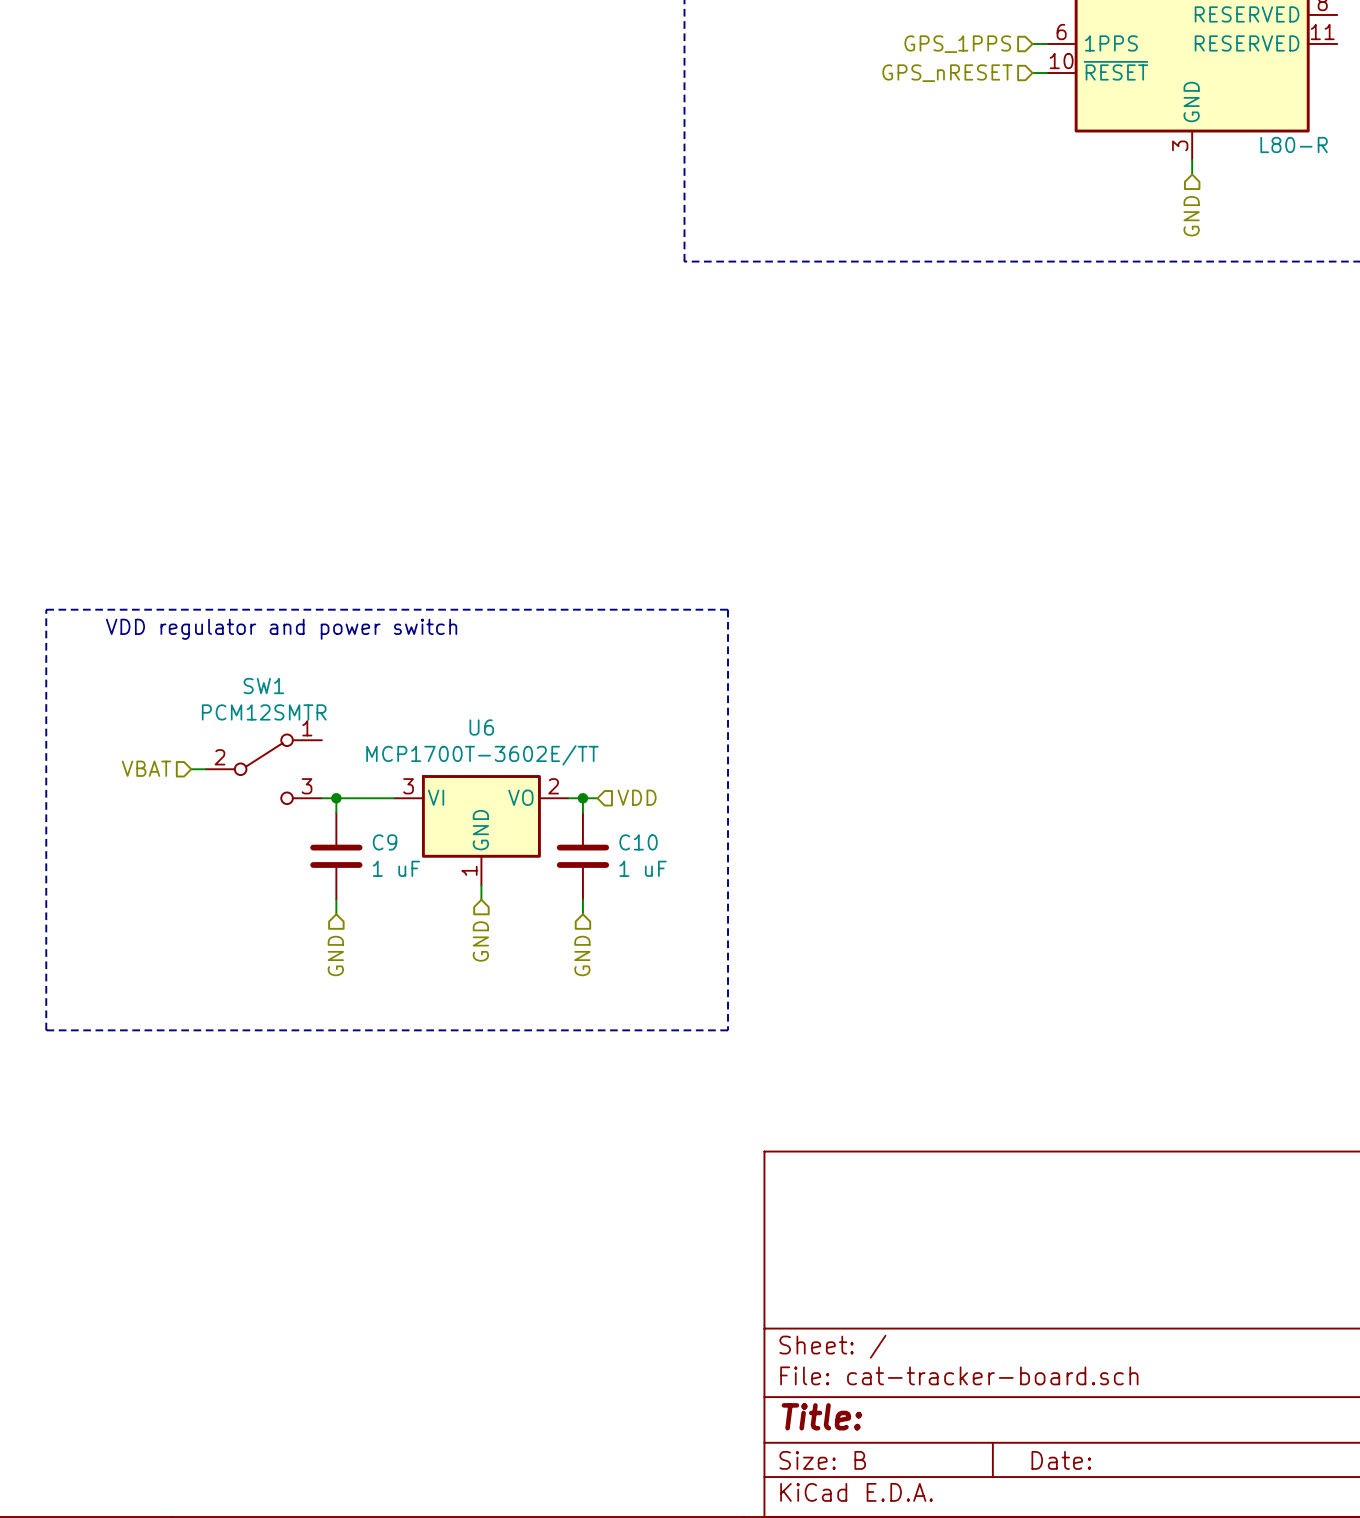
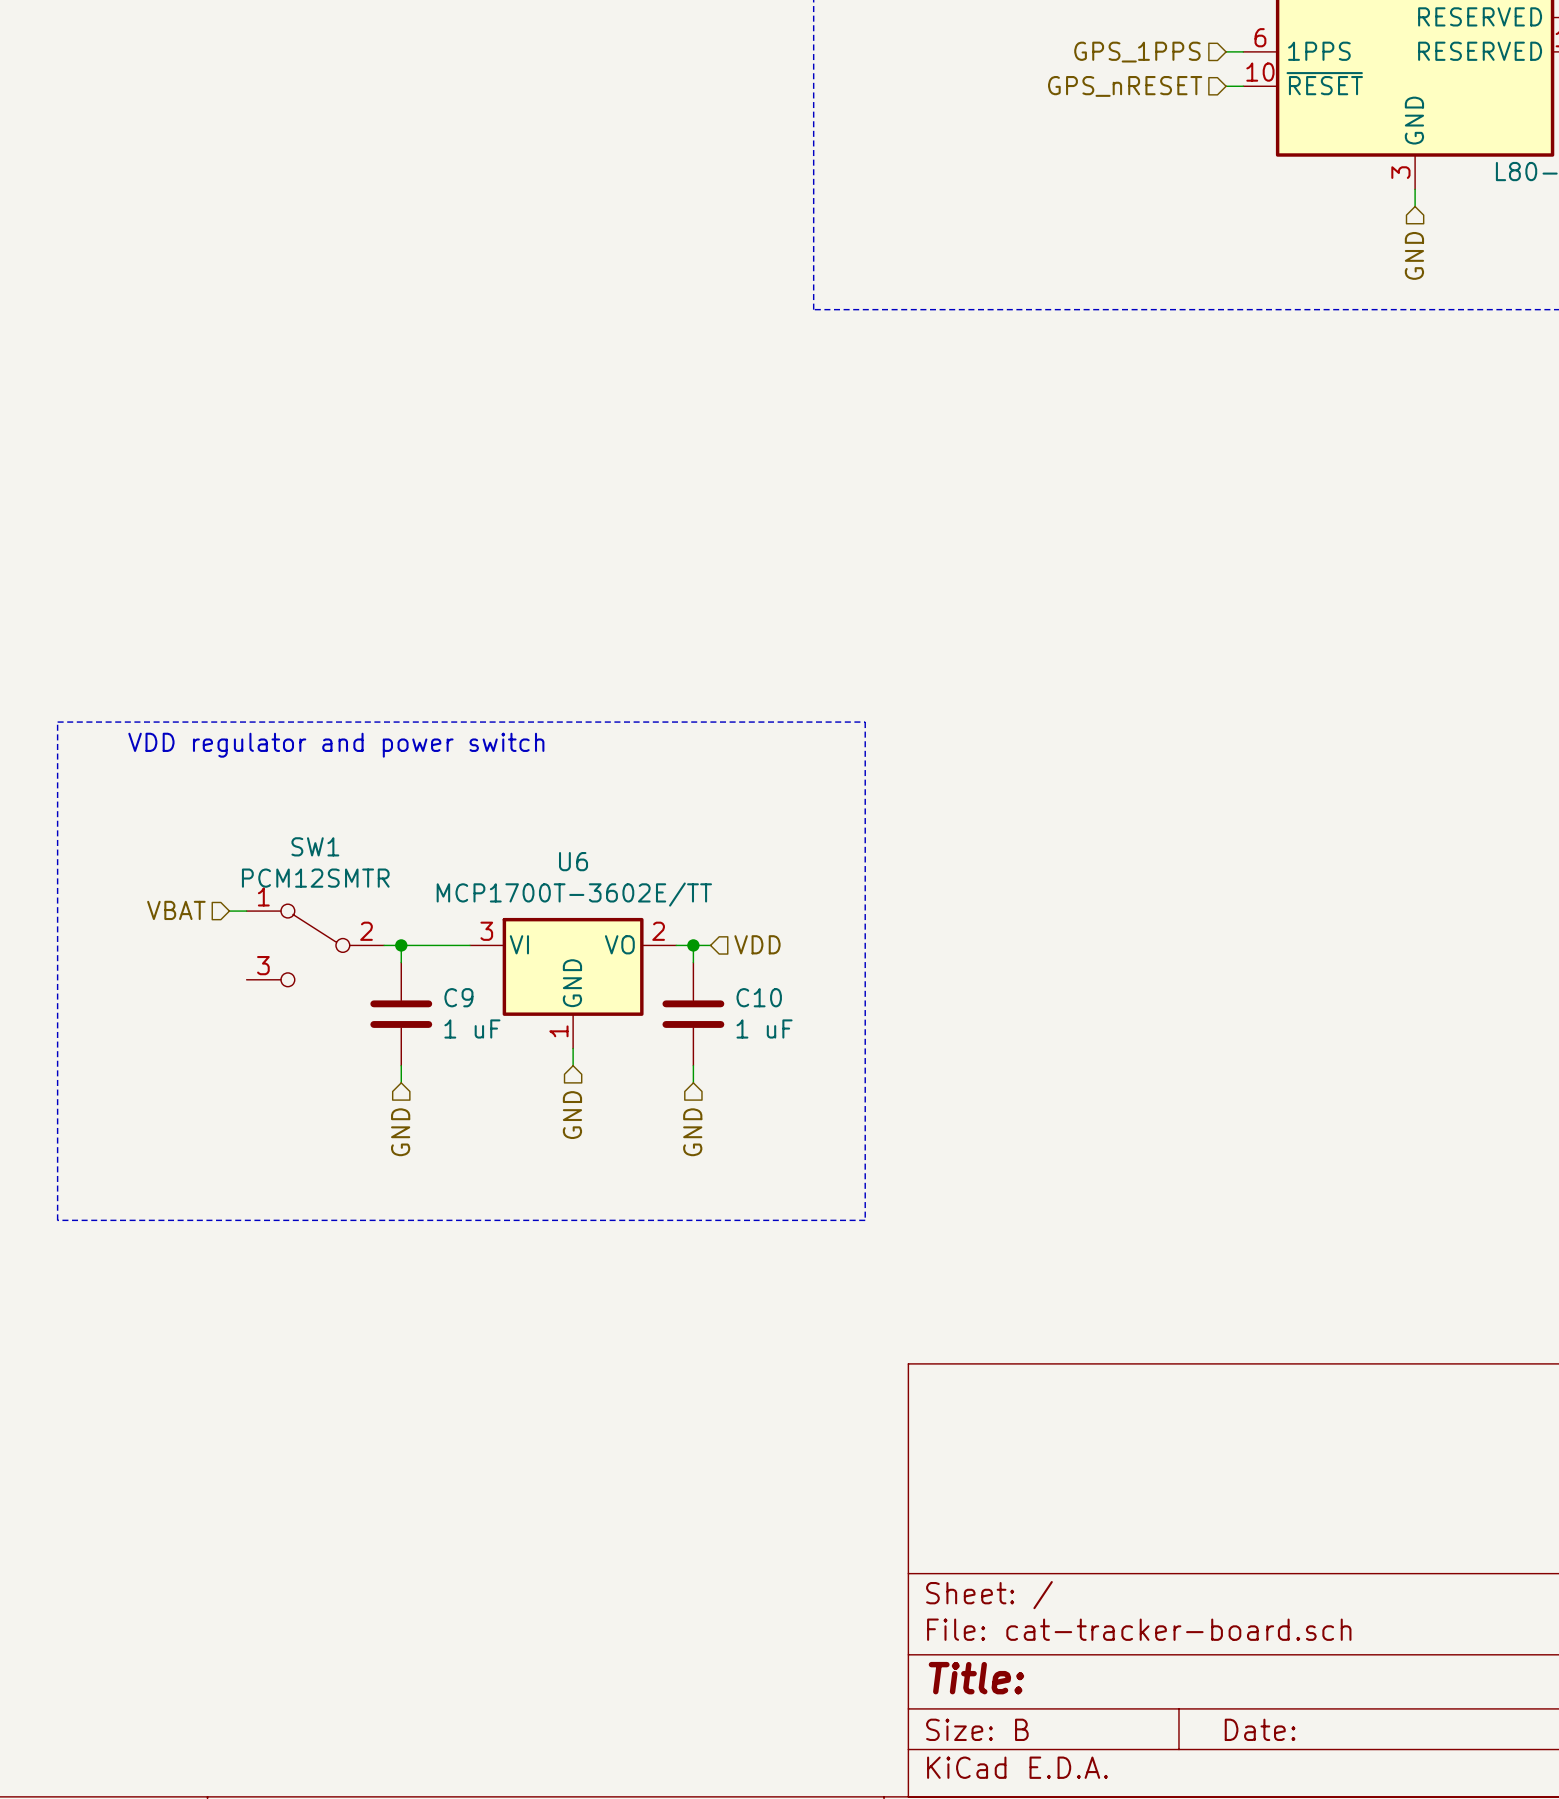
SW1 flip: as is (263, 769) -> left-right (315, 945)

